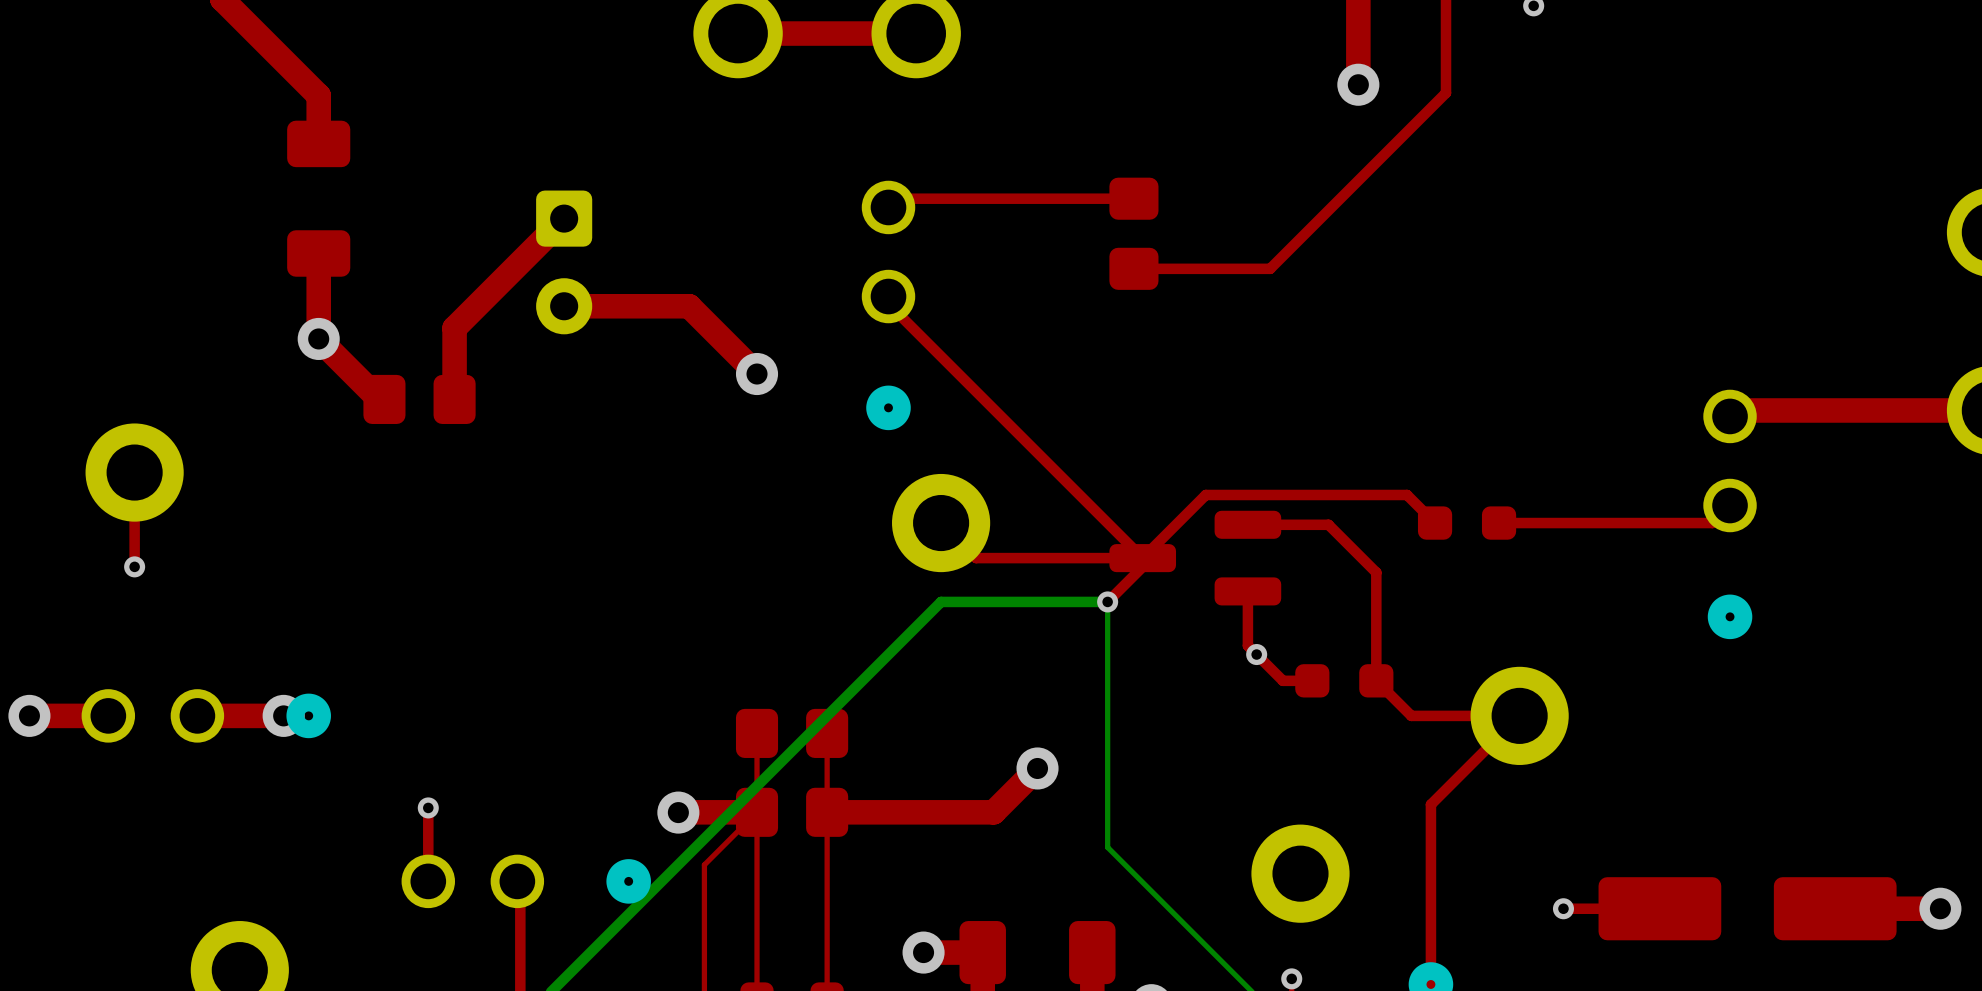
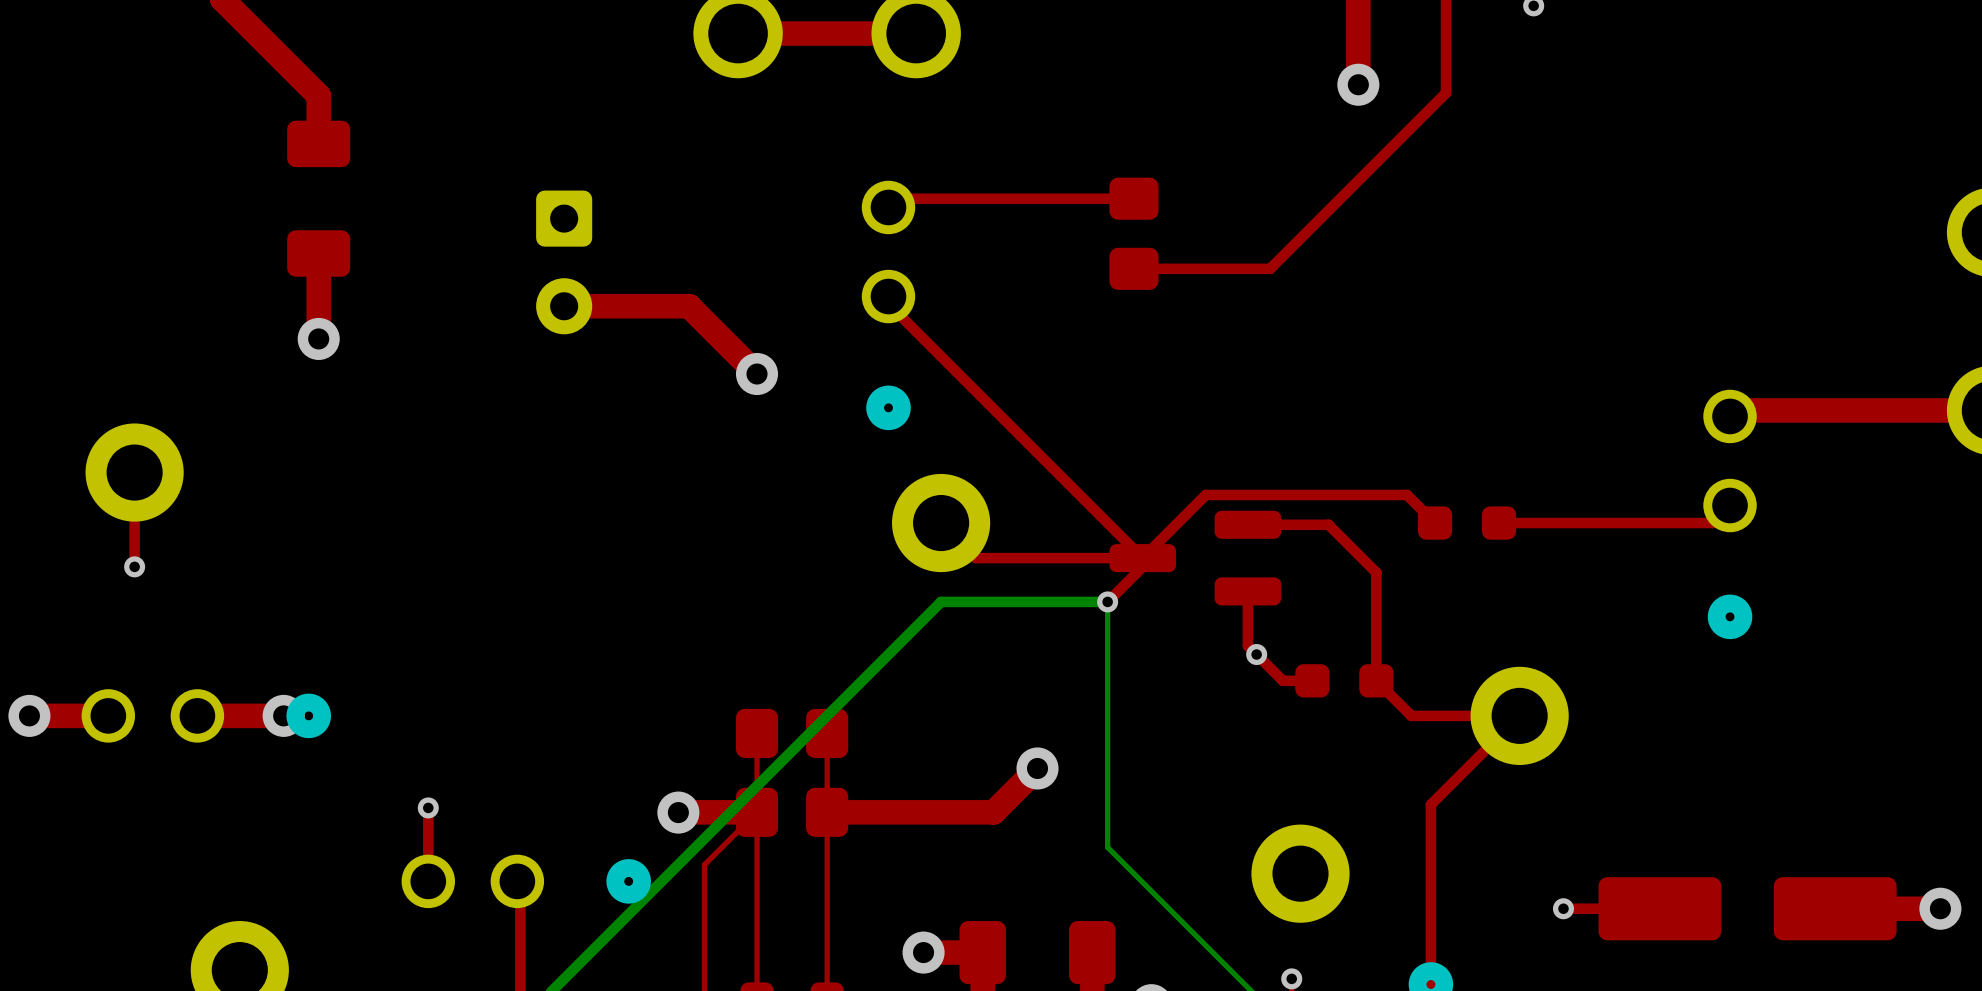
top track: (564, 218) (454, 328) (454, 399) -> none
top track: (318, 338) (379, 399) (384, 399) -> none
part: (419, 399) -> none

